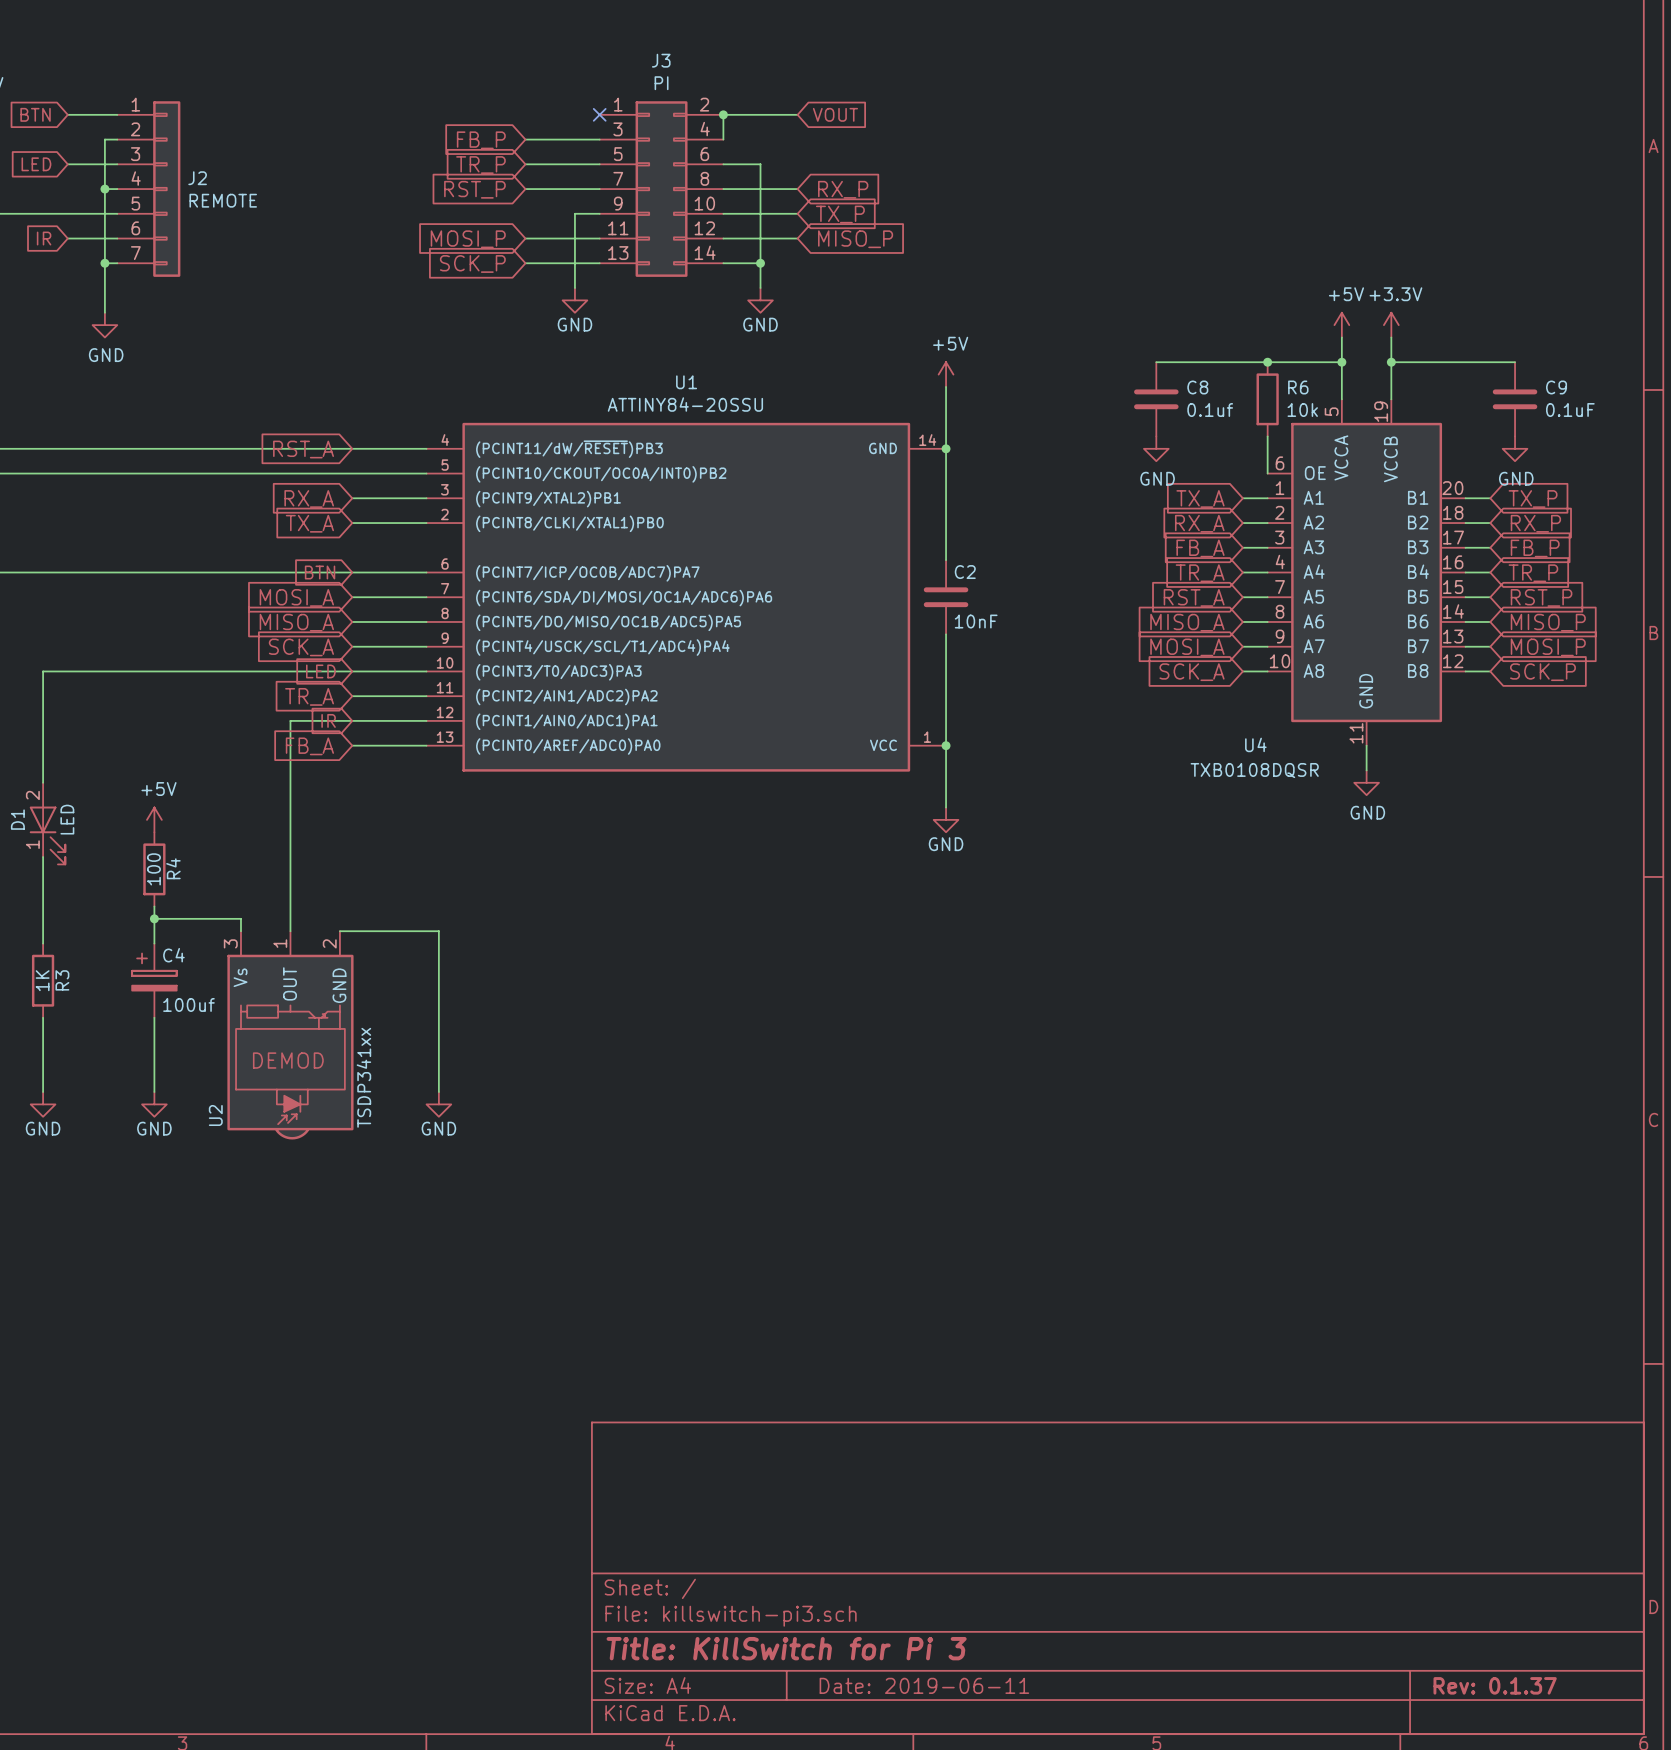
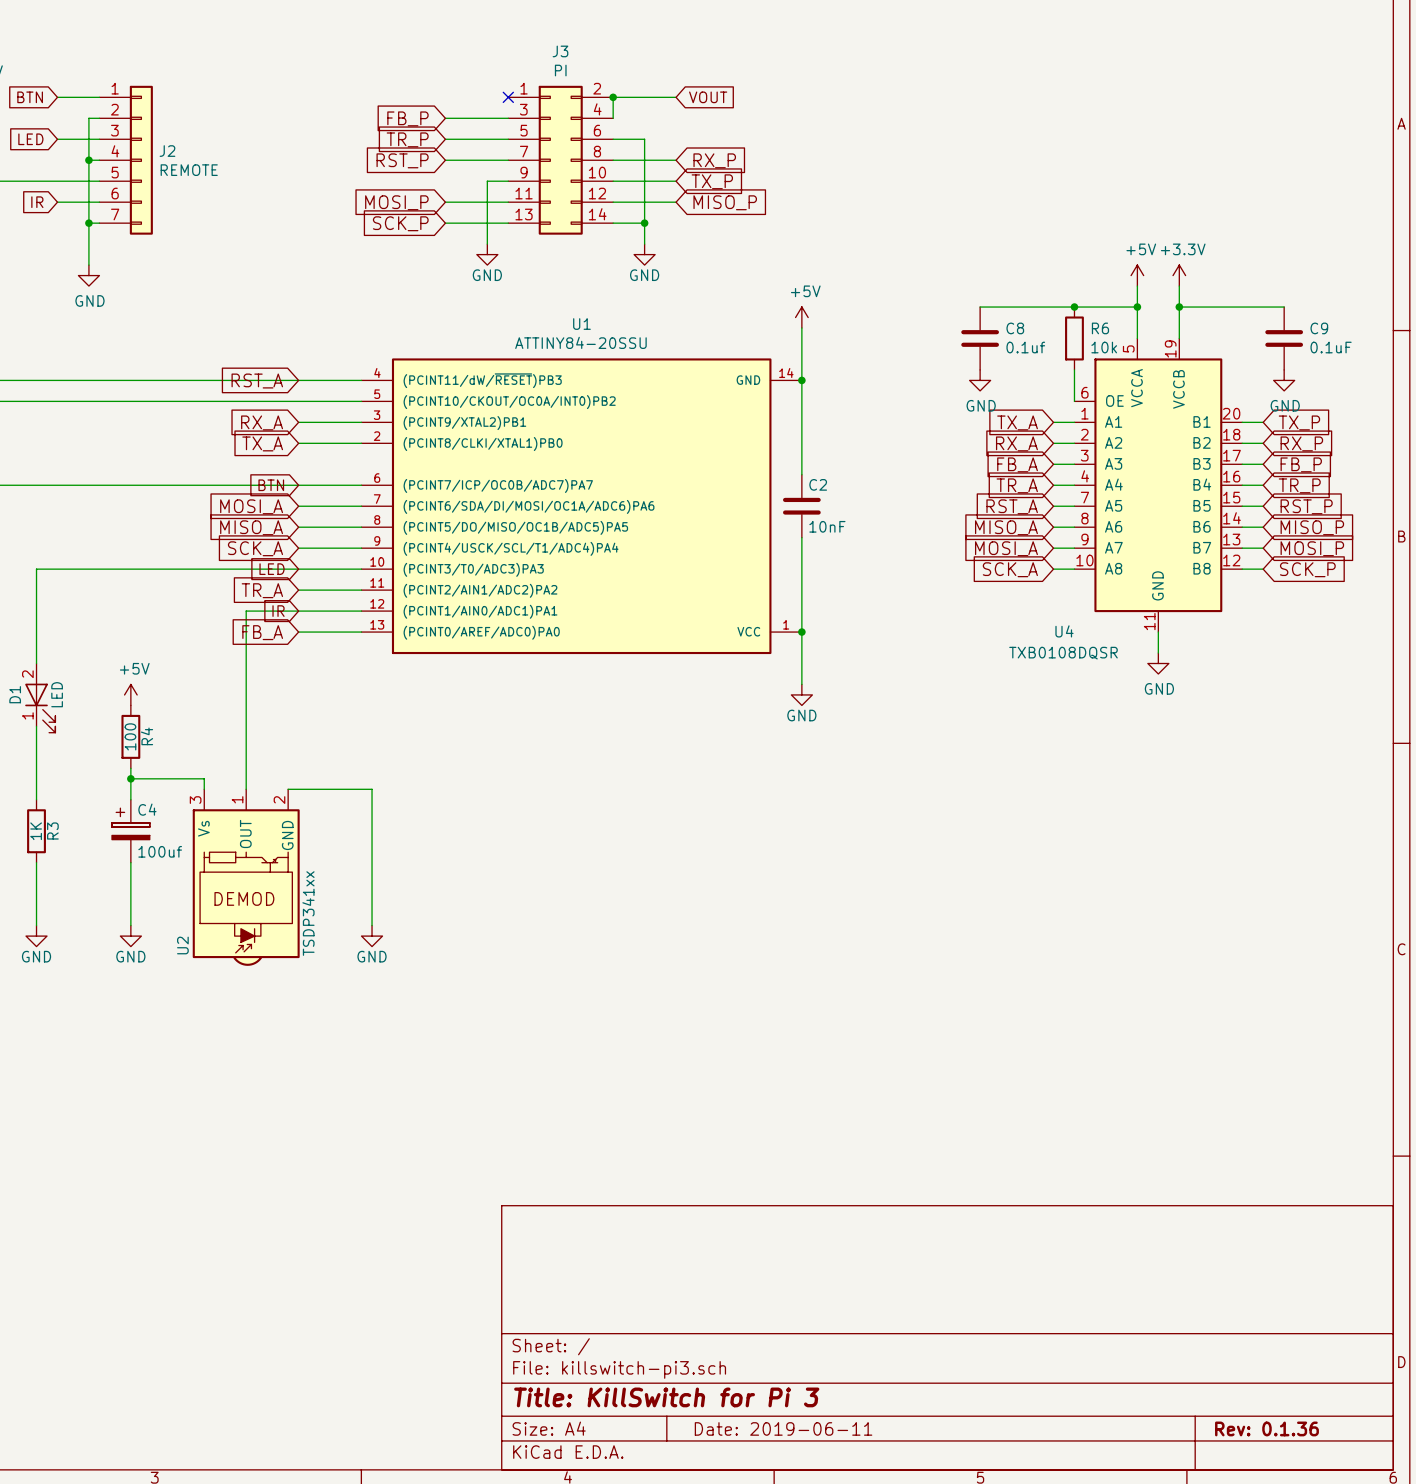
title block: Rev: 0.1.37 (1495, 1685) -> Rev: 0.1.36 (1266, 1428)

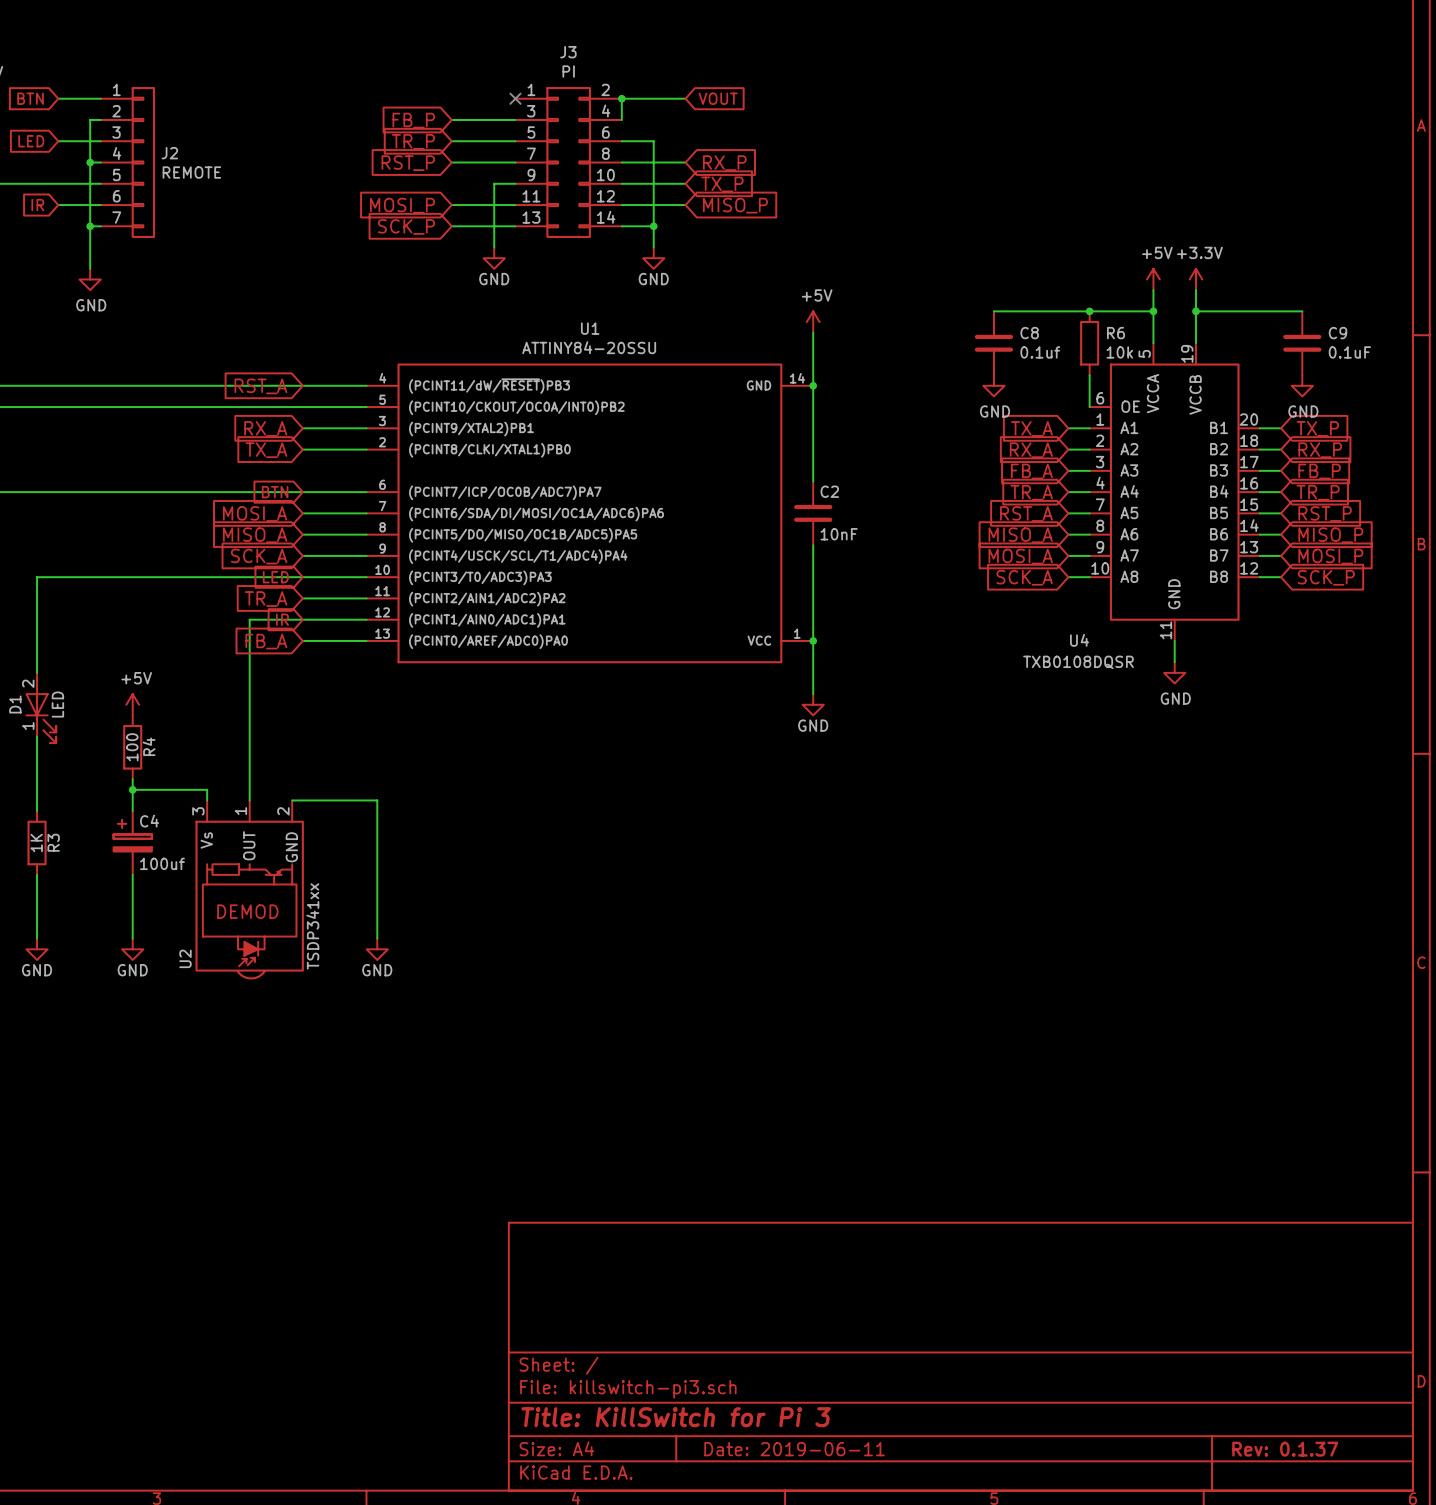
title block: Rev: 0.1.36 (1266, 1428) -> Rev: 0.1.37 (1285, 1449)

